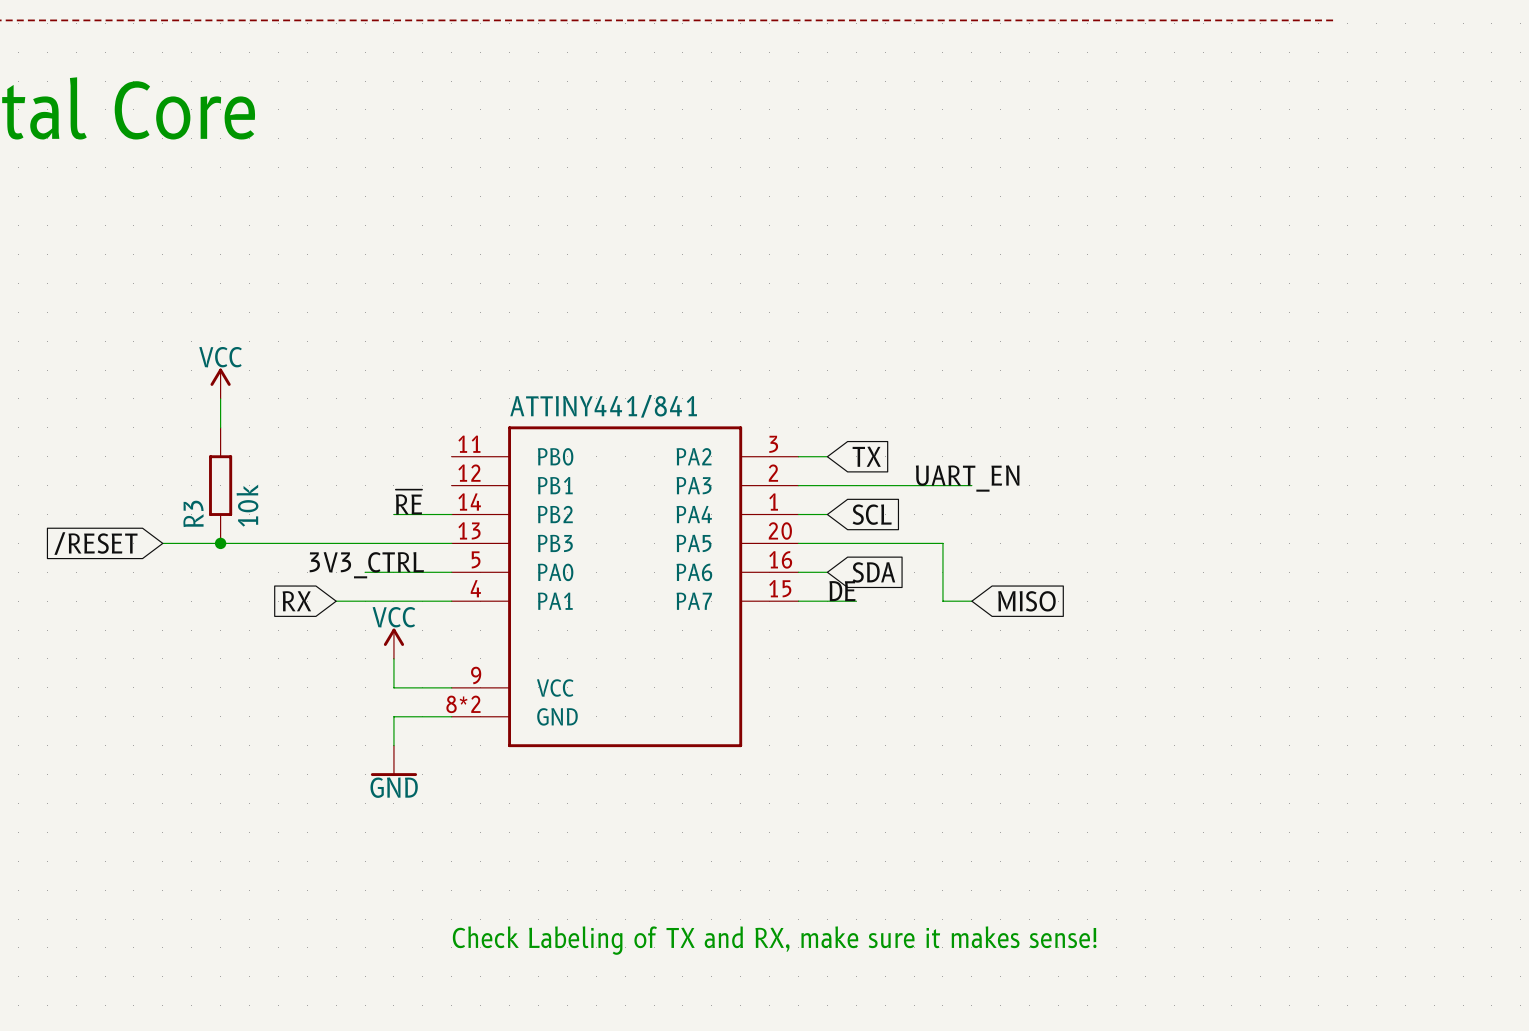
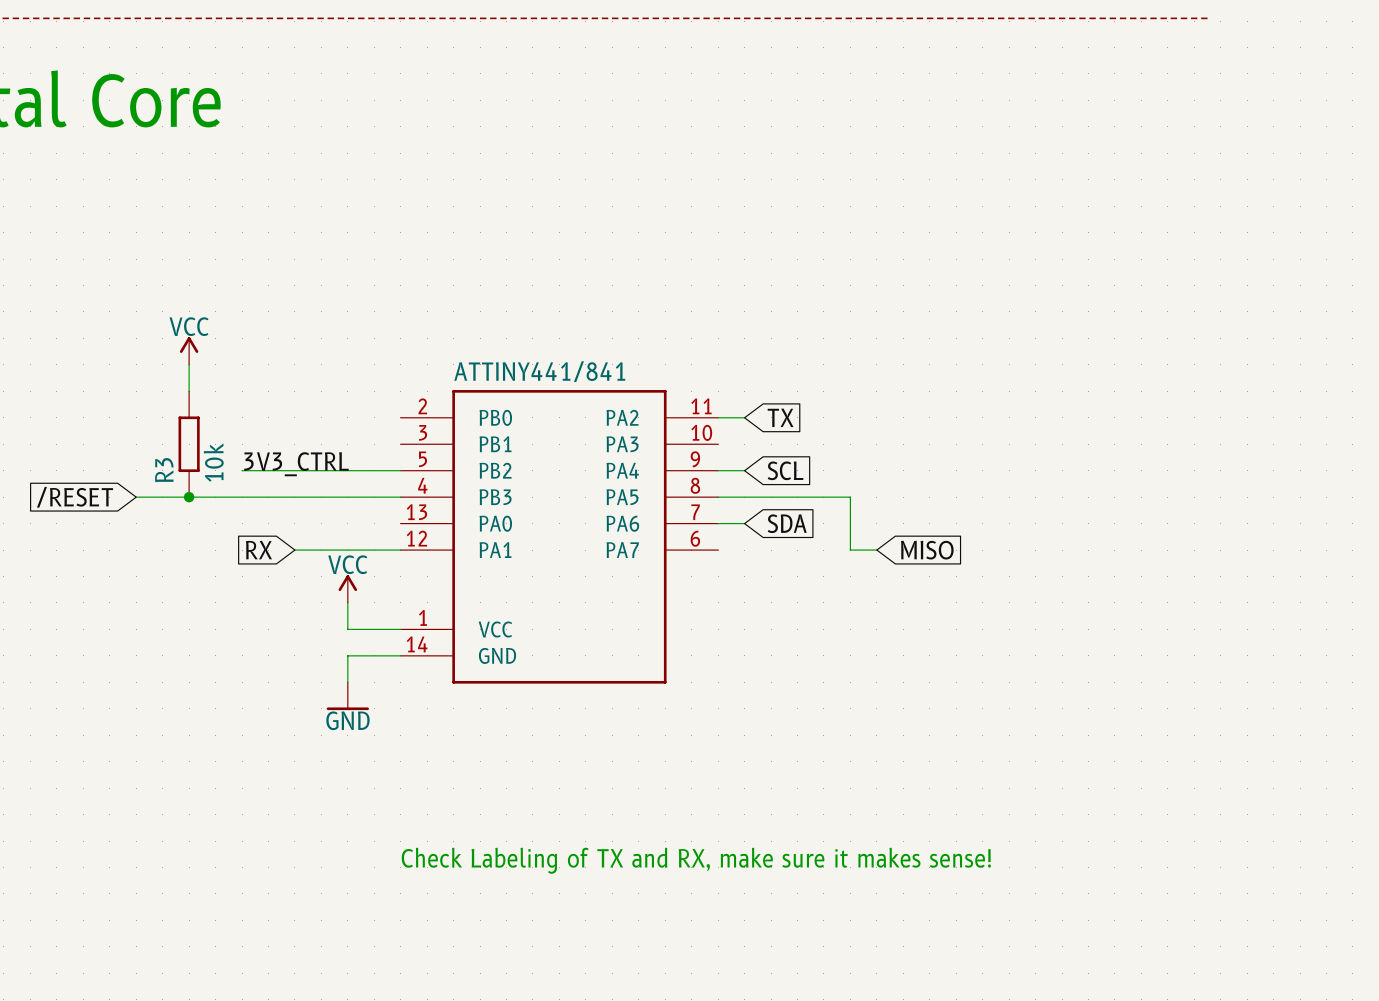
part symbol: [451, 426, 799, 748] -> [400, 390, 719, 684]
label: UART_EN (967, 478) -> none
wire: (798, 485) (971, 485) -> none
label: ~{RE} (408, 502) -> none
wire: none -> (242, 470) (347, 470)
label position: 3V3_CTRL (366, 565) -> 3V3_CTRL (296, 464)
wire: (365, 572) (451, 572) -> none
label: DE (842, 591) -> none
wire: (798, 601) (856, 601) -> none

